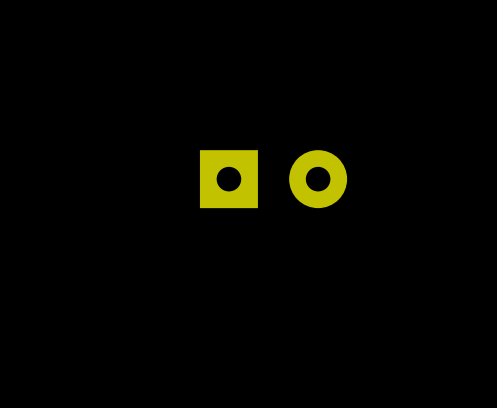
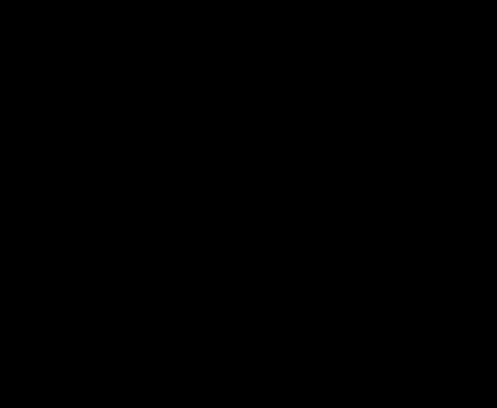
part: (273, 179) -> none

